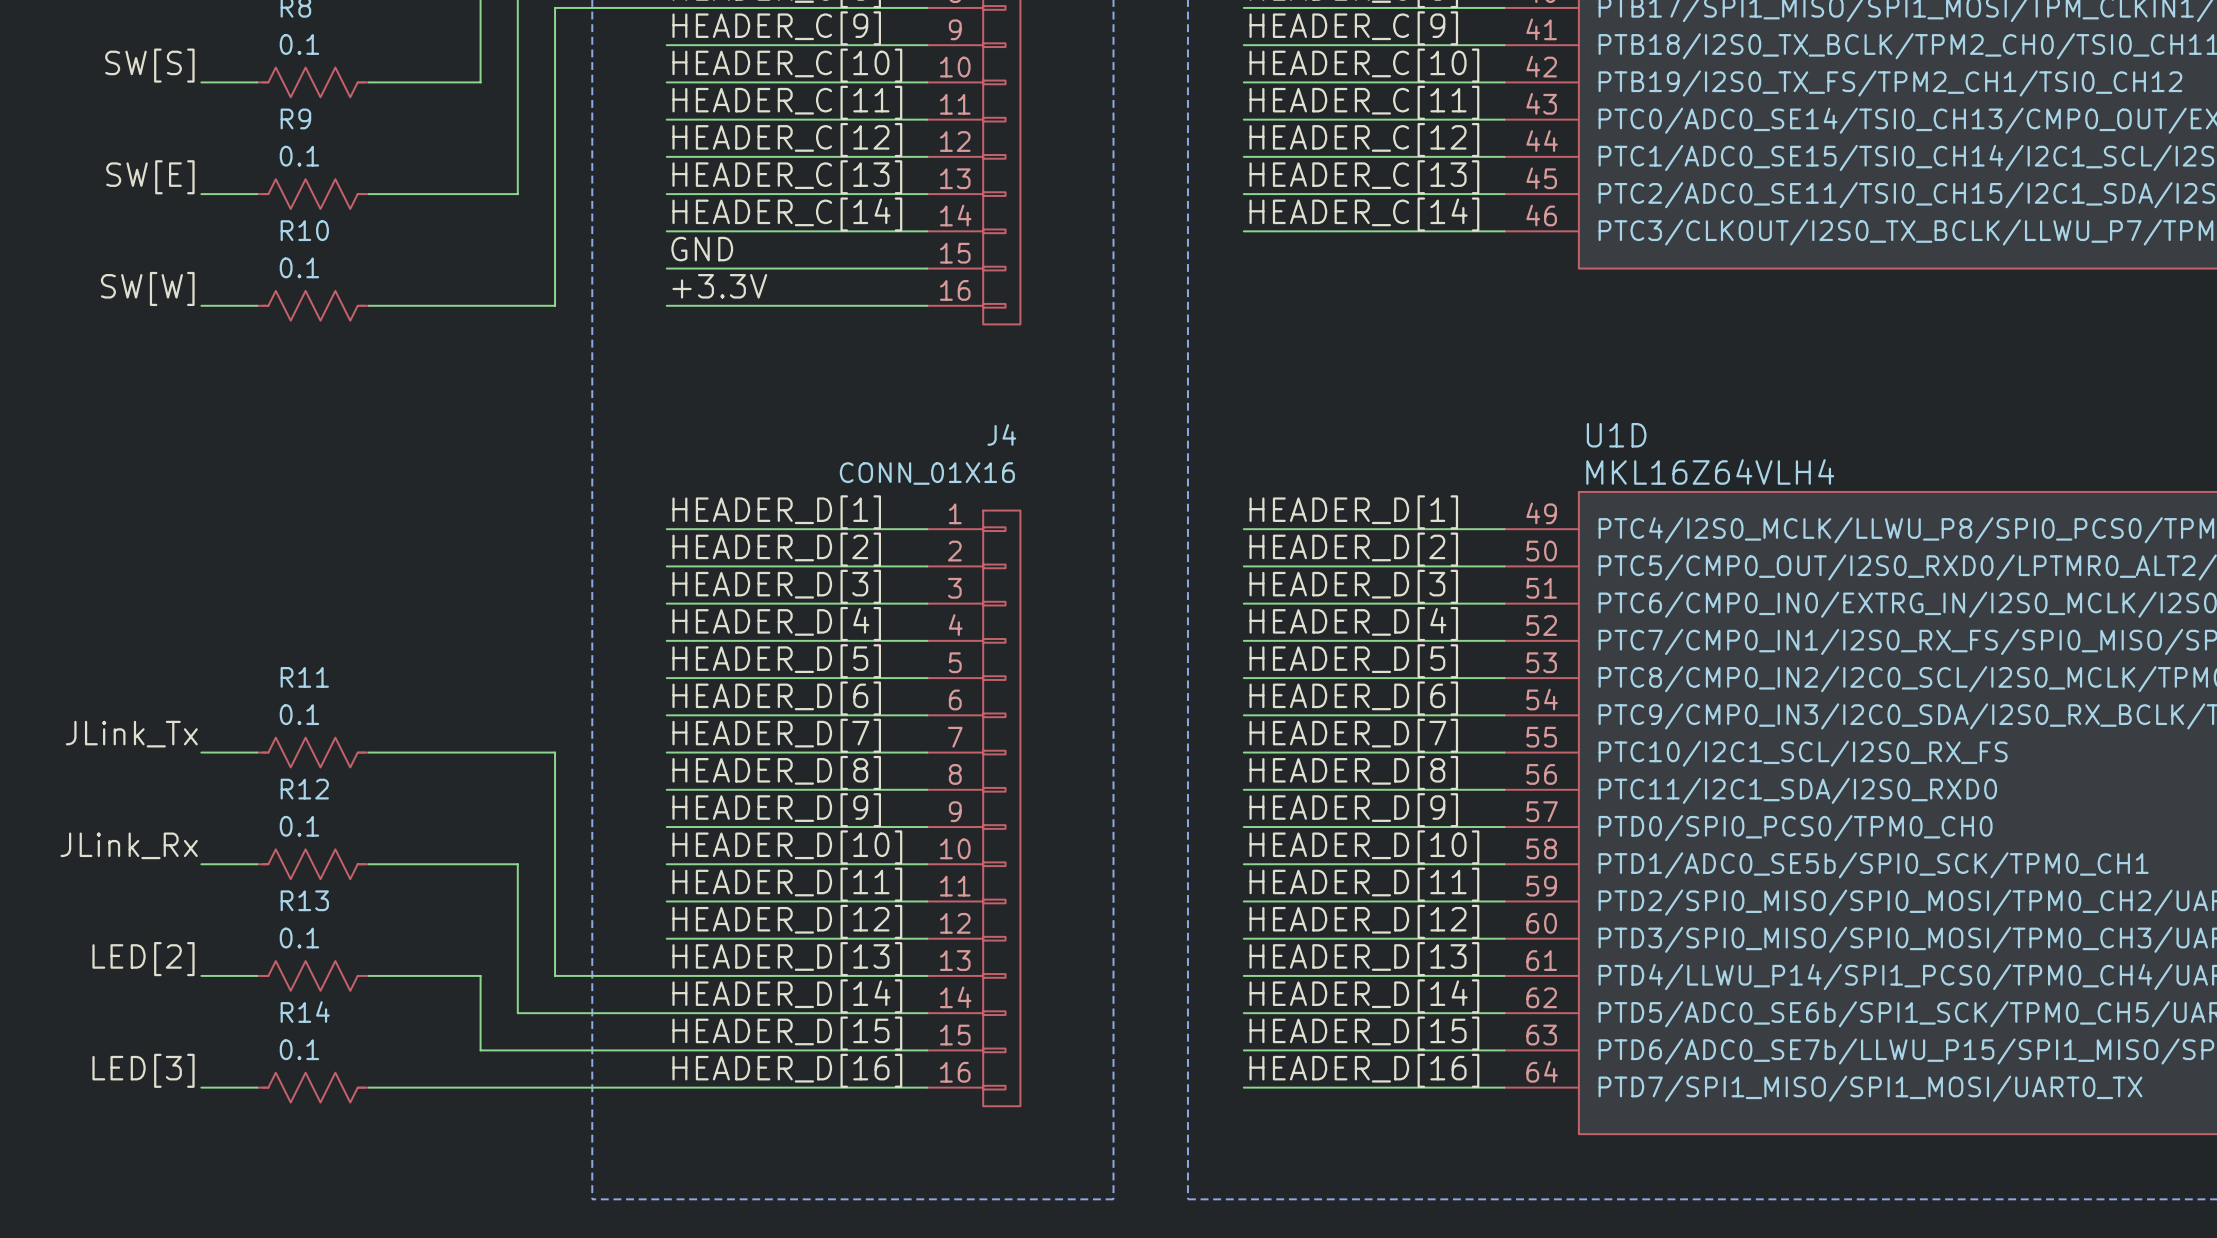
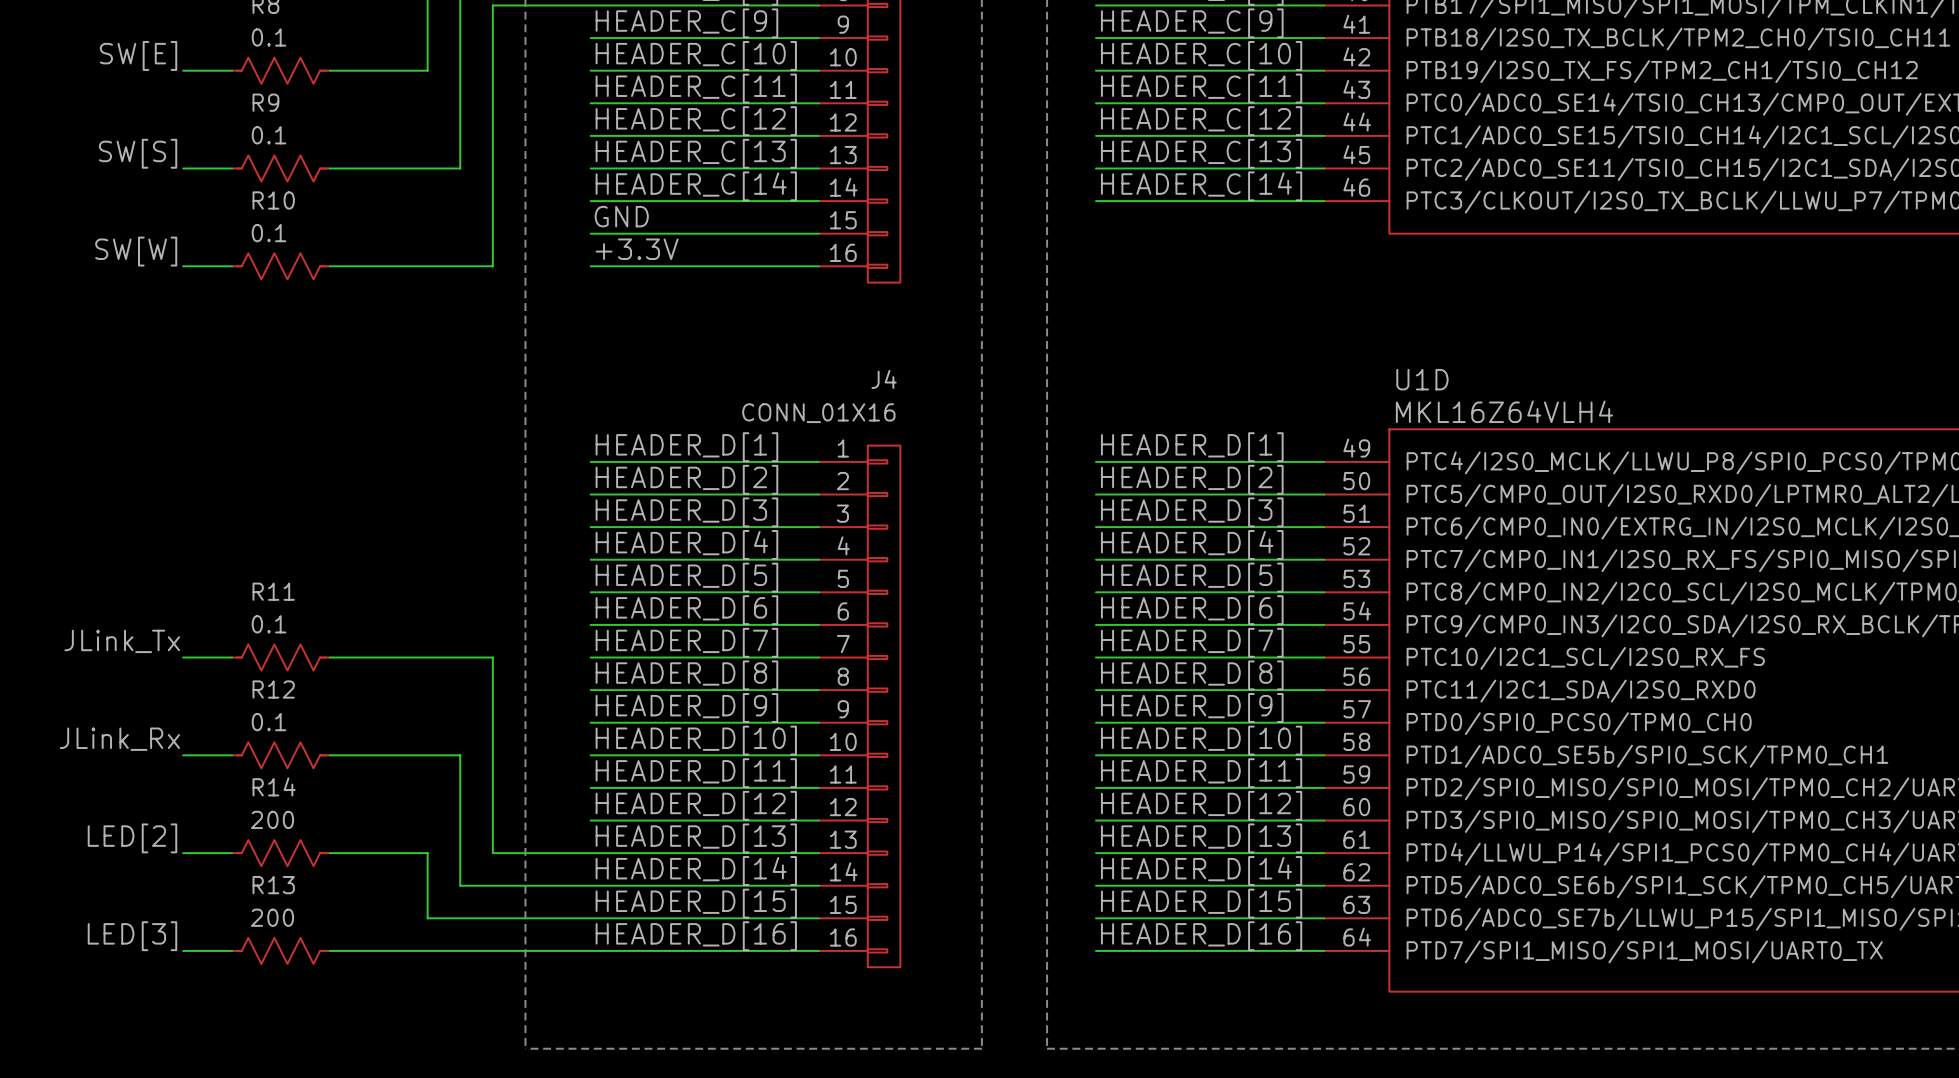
label: SW[S] (149, 65) -> SW[E] (138, 55)
label: SW[E] (150, 177) -> SW[S] (138, 153)
R13 name: R13 (304, 900) -> R14 (274, 786)
R13 value: 0.1 (299, 938) -> 200 (272, 819)
R14 name: R14 (305, 1012) -> R13 (273, 885)
R14 value: 0.1 (299, 1049) -> 200 (272, 917)

